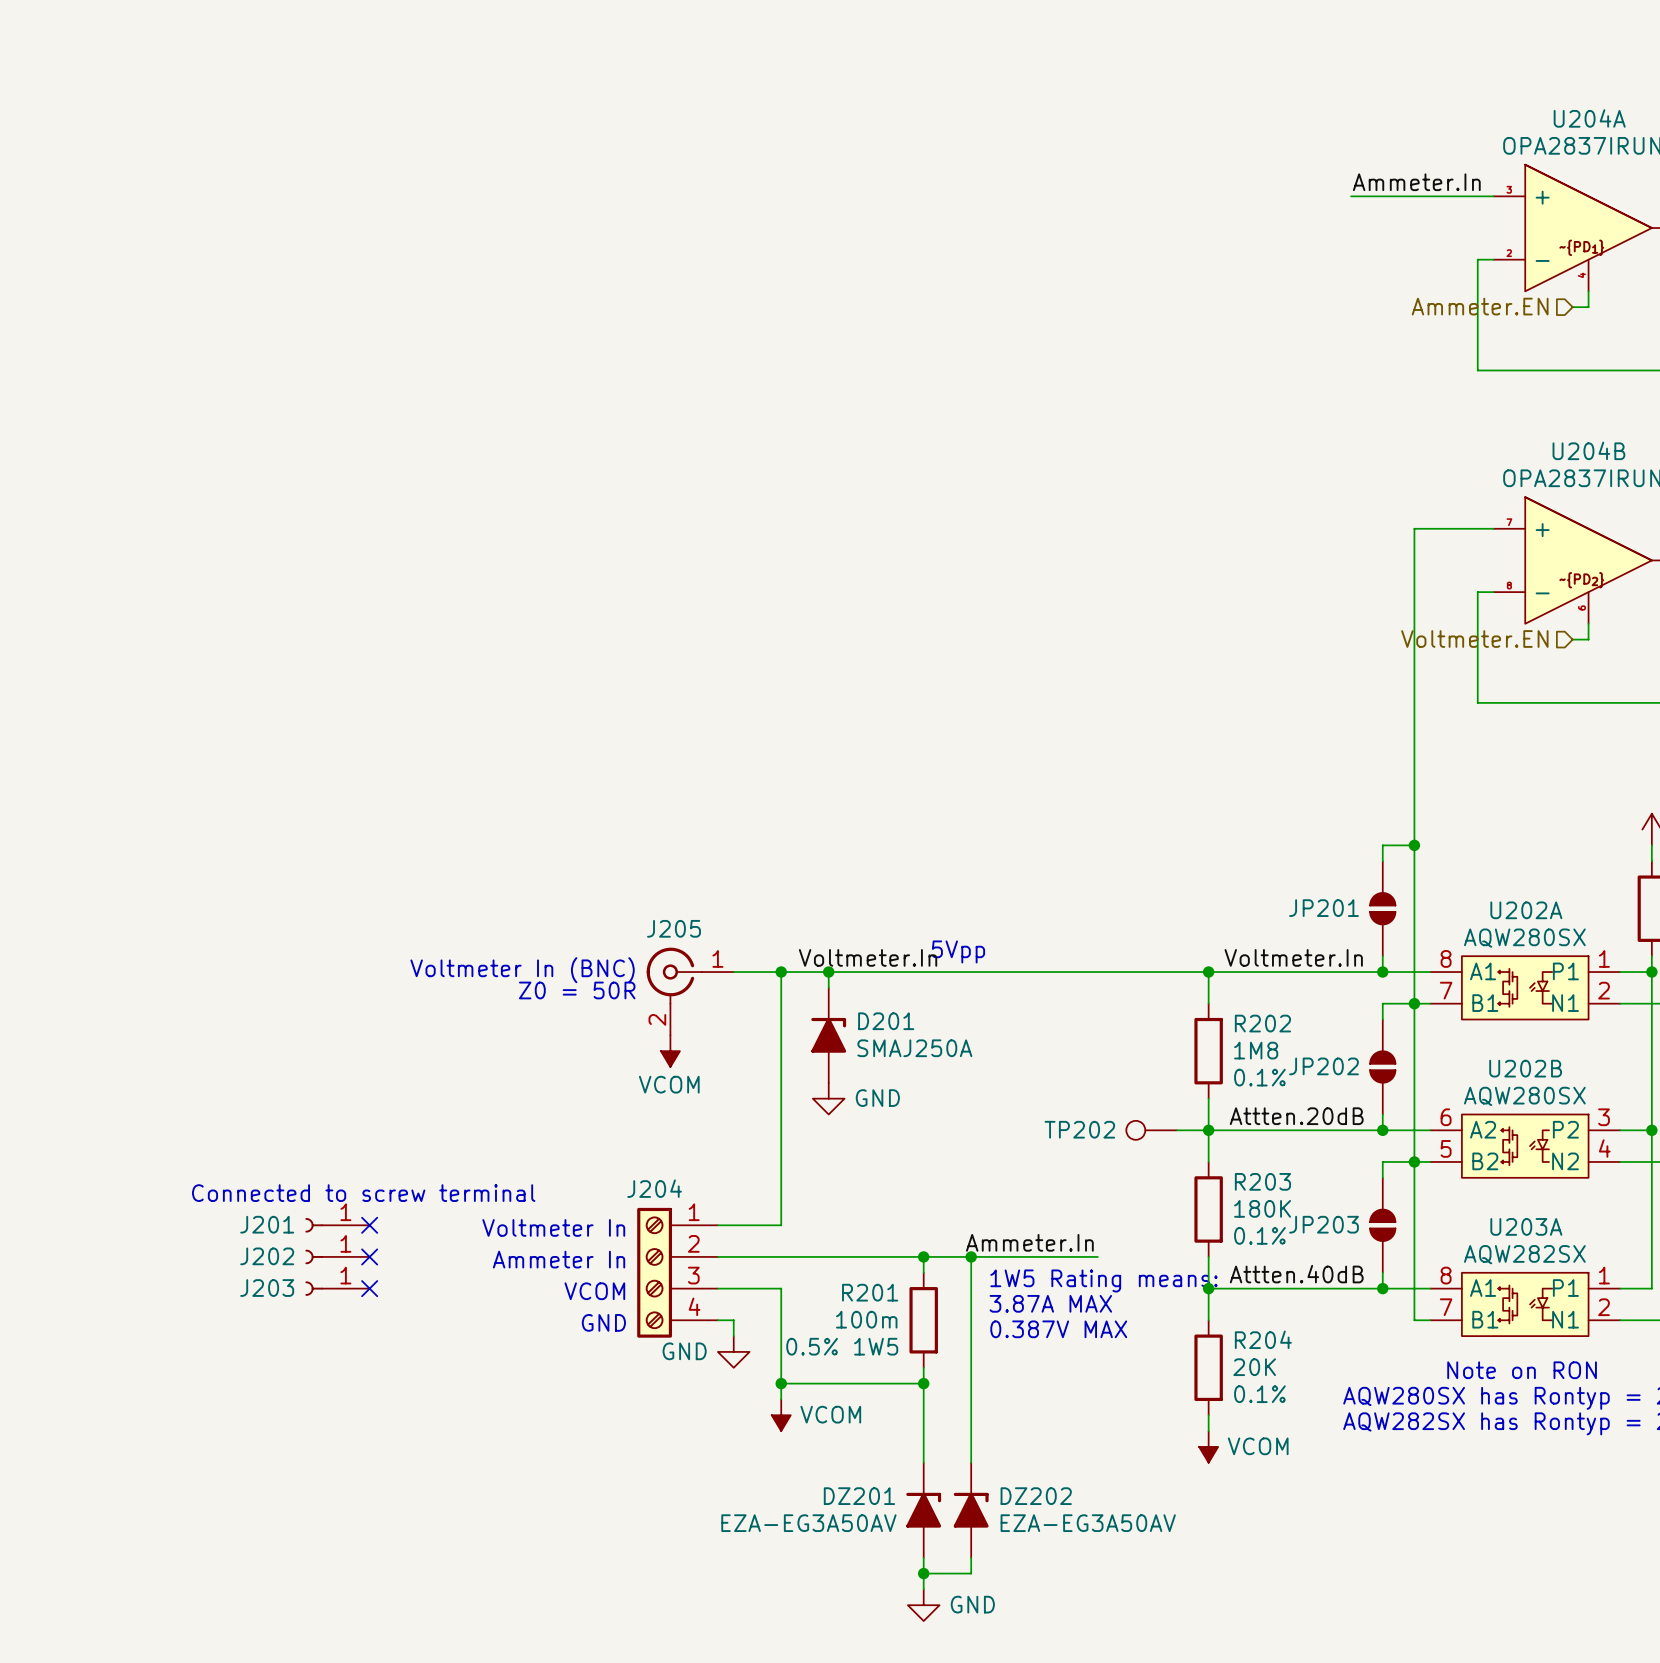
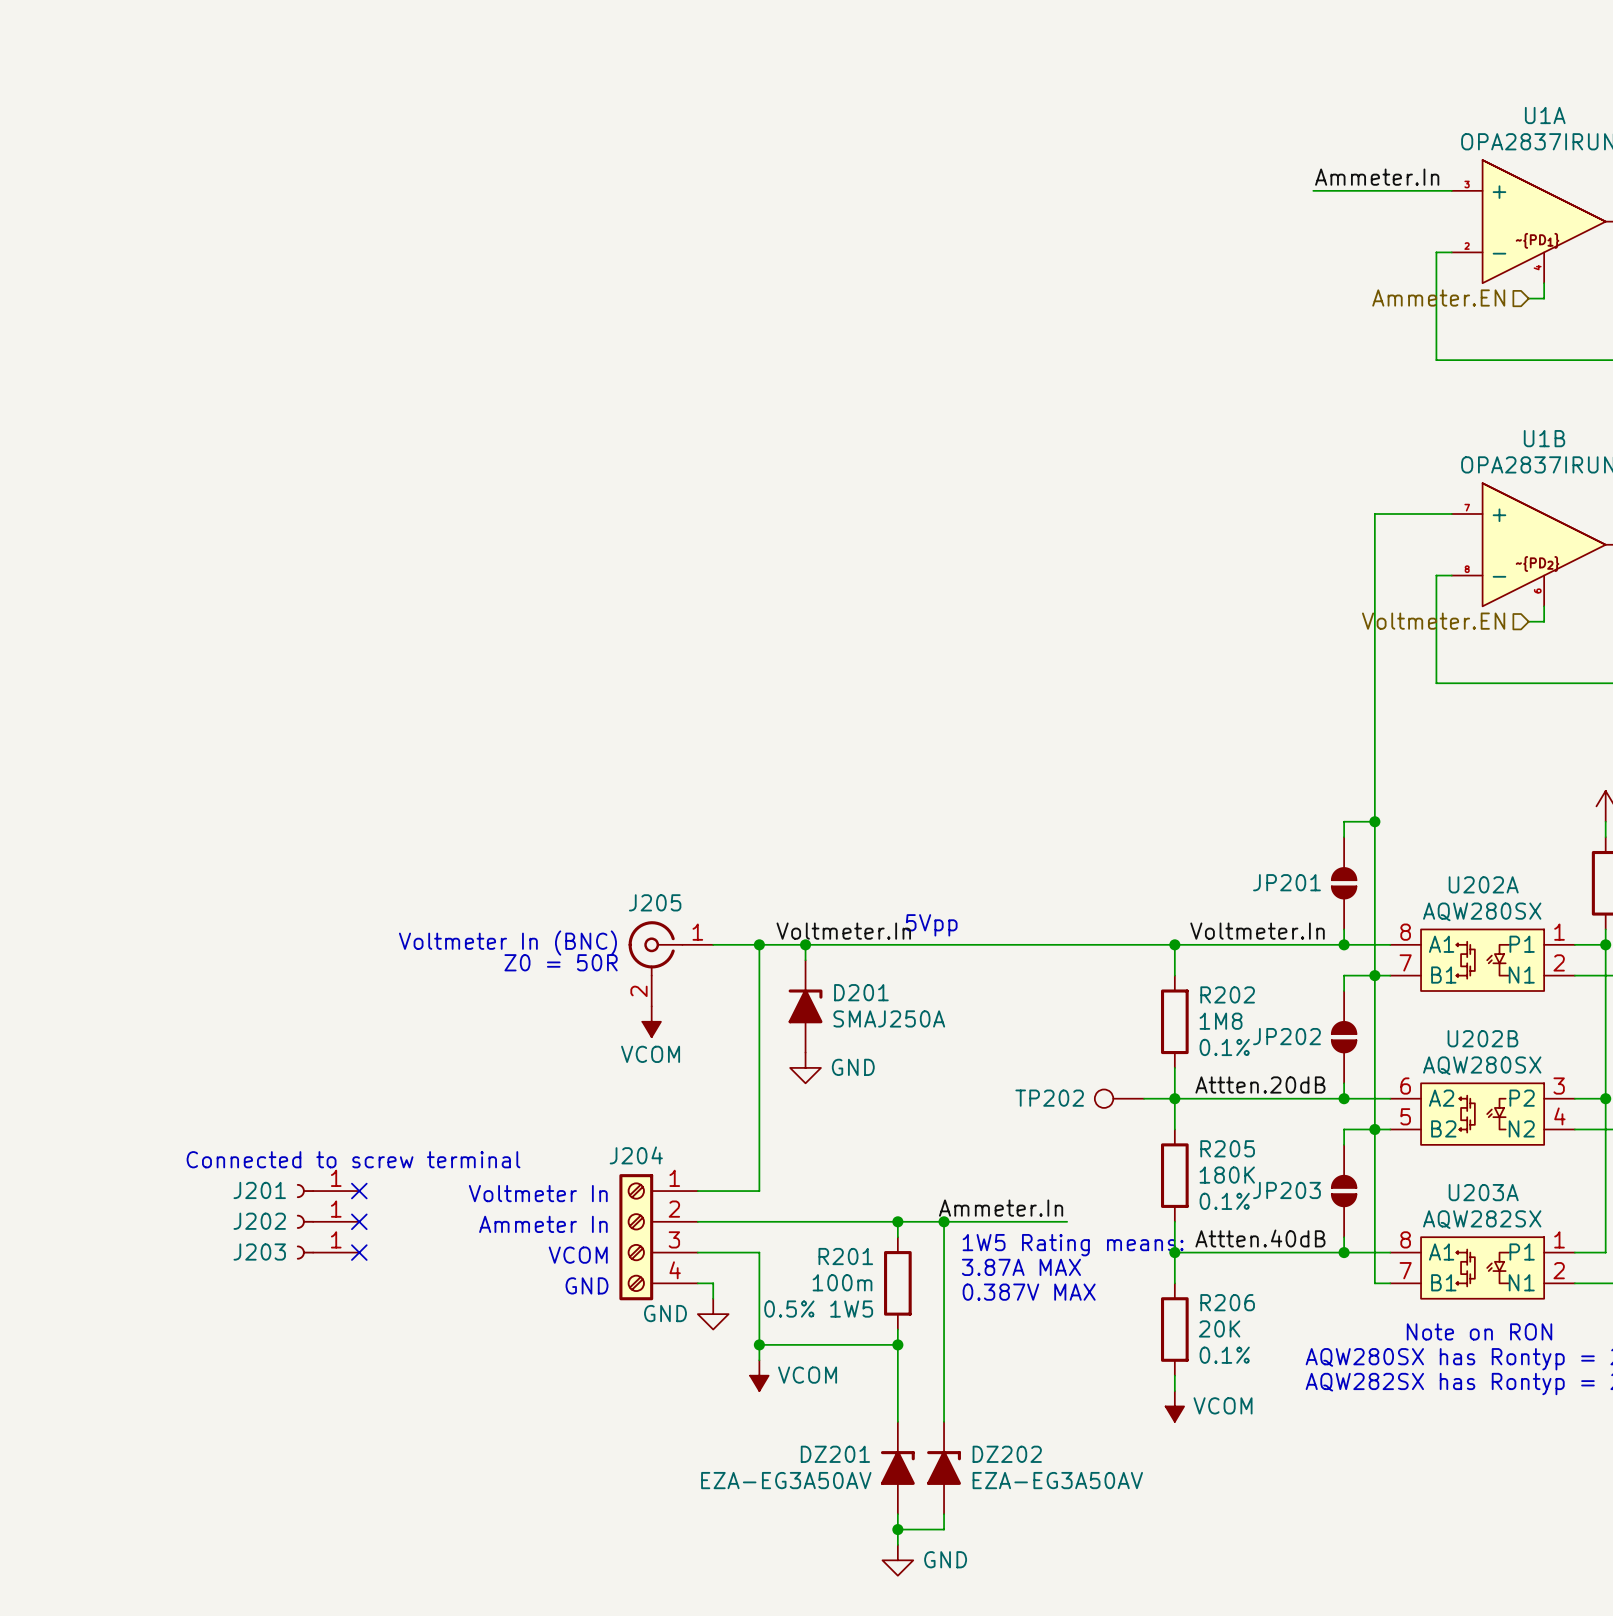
U204A name: U204A (1589, 118) -> U1A (1545, 115)
U204B name: U204B (1588, 450) -> U1B (1544, 438)
R203 name: R203 (1262, 1181) -> R205 (1227, 1148)
R204 name: R204 (1263, 1339) -> R206 (1227, 1302)

